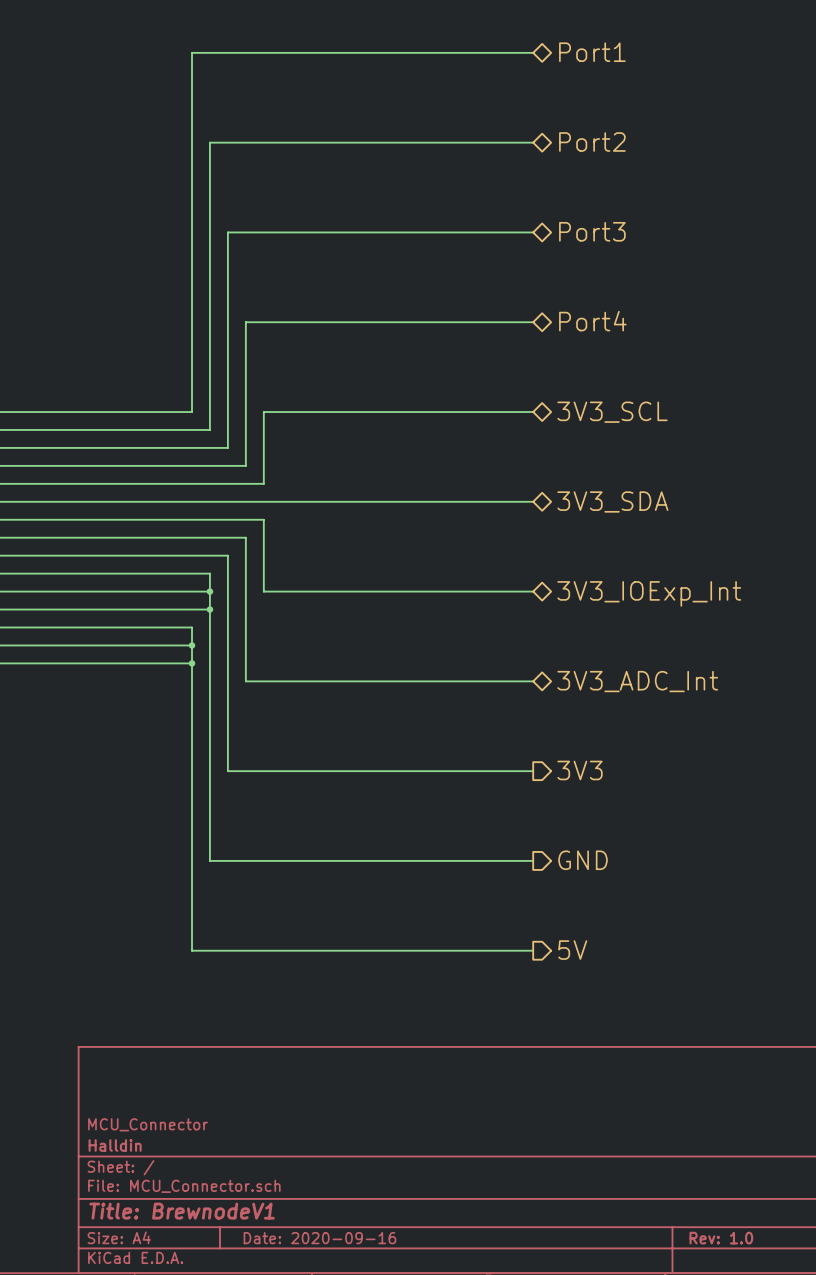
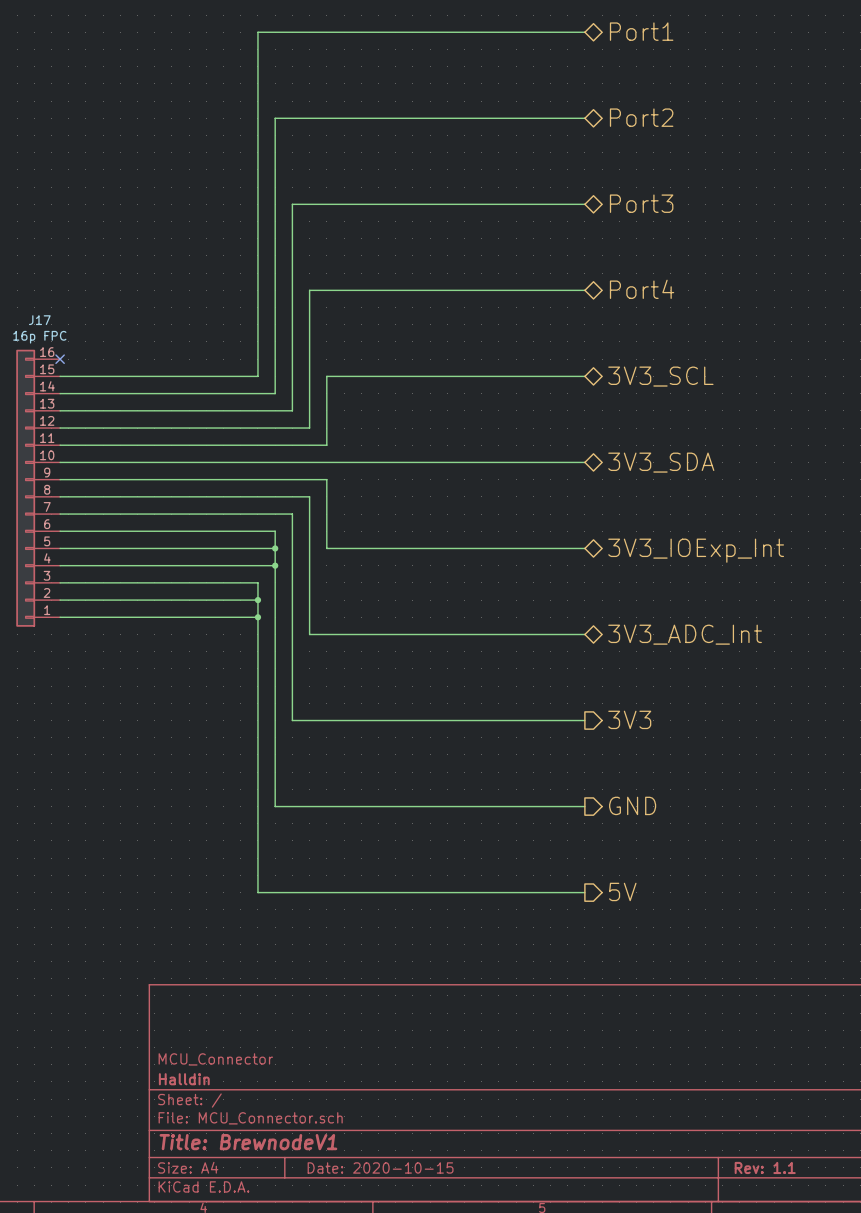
title block: Date: 2020-09-16 (319, 1238) -> Date: 2020-10-15 (380, 1167)
title block: Rev: 1.0 (721, 1238) -> Rev: 1.1 (765, 1167)

